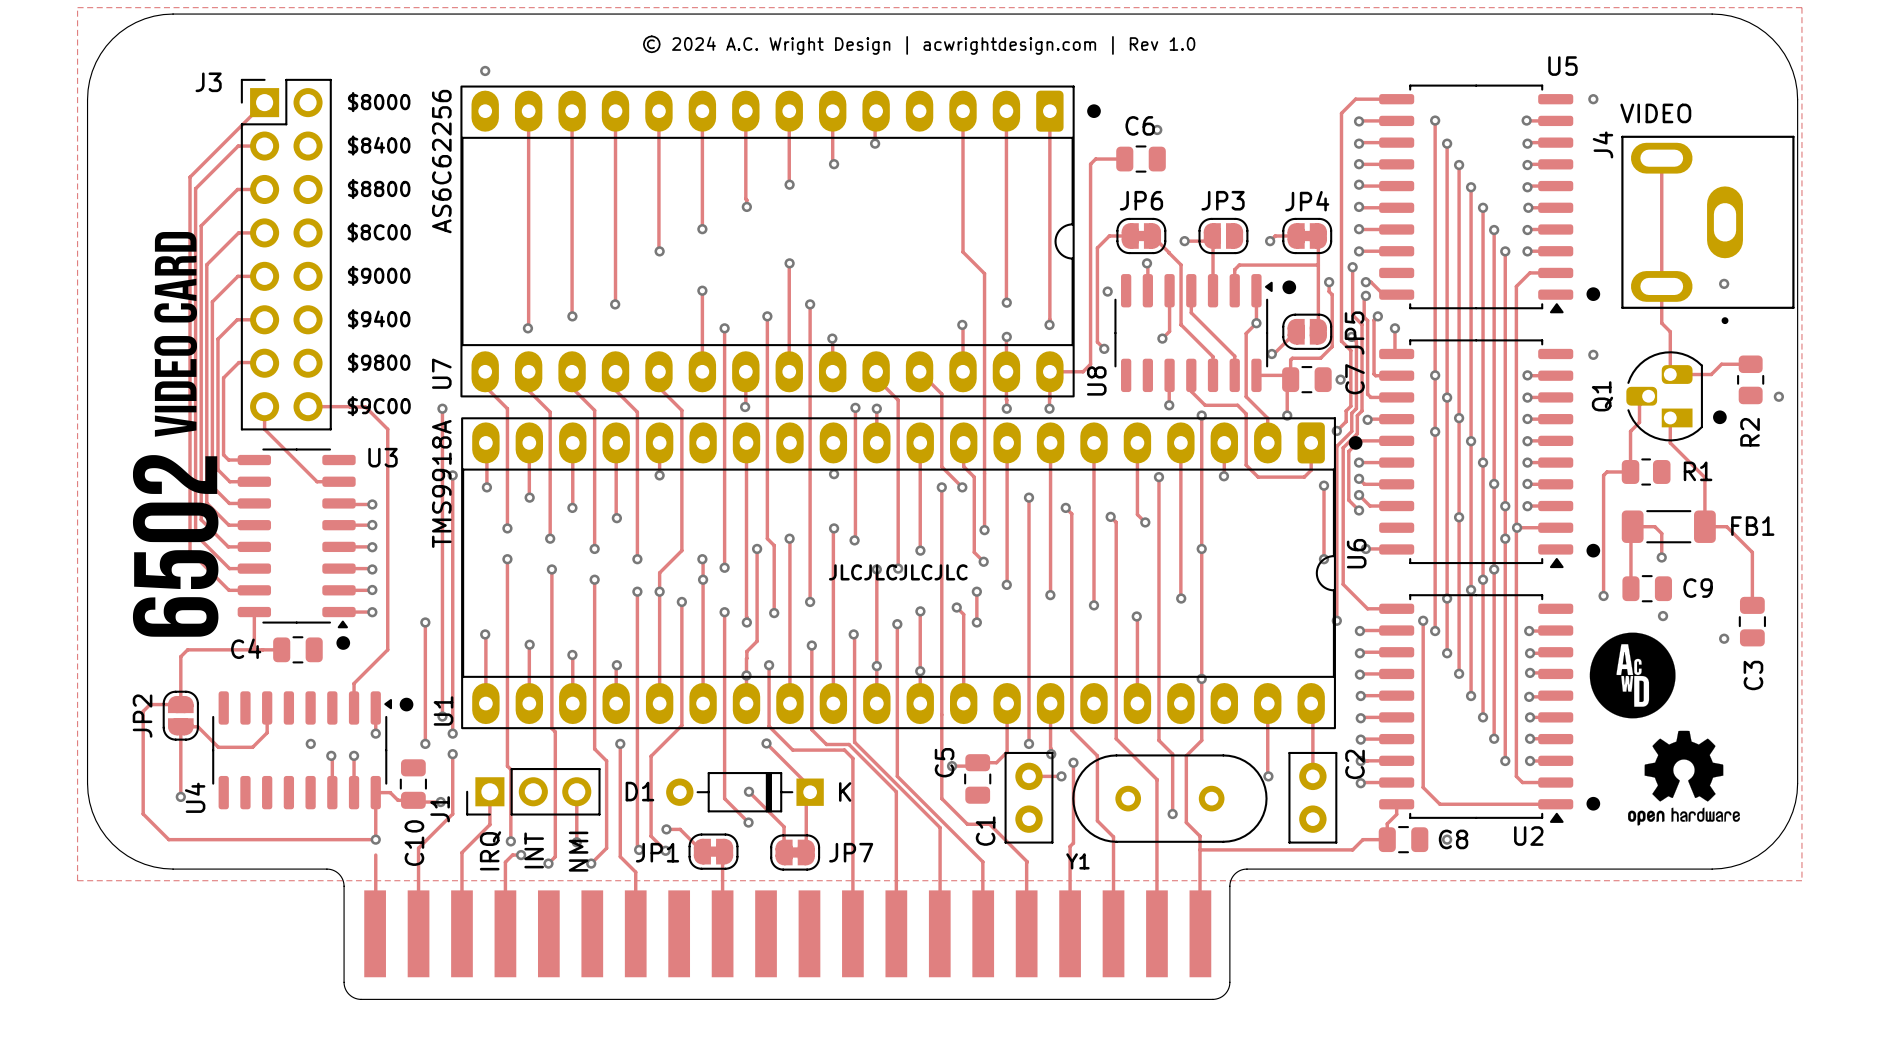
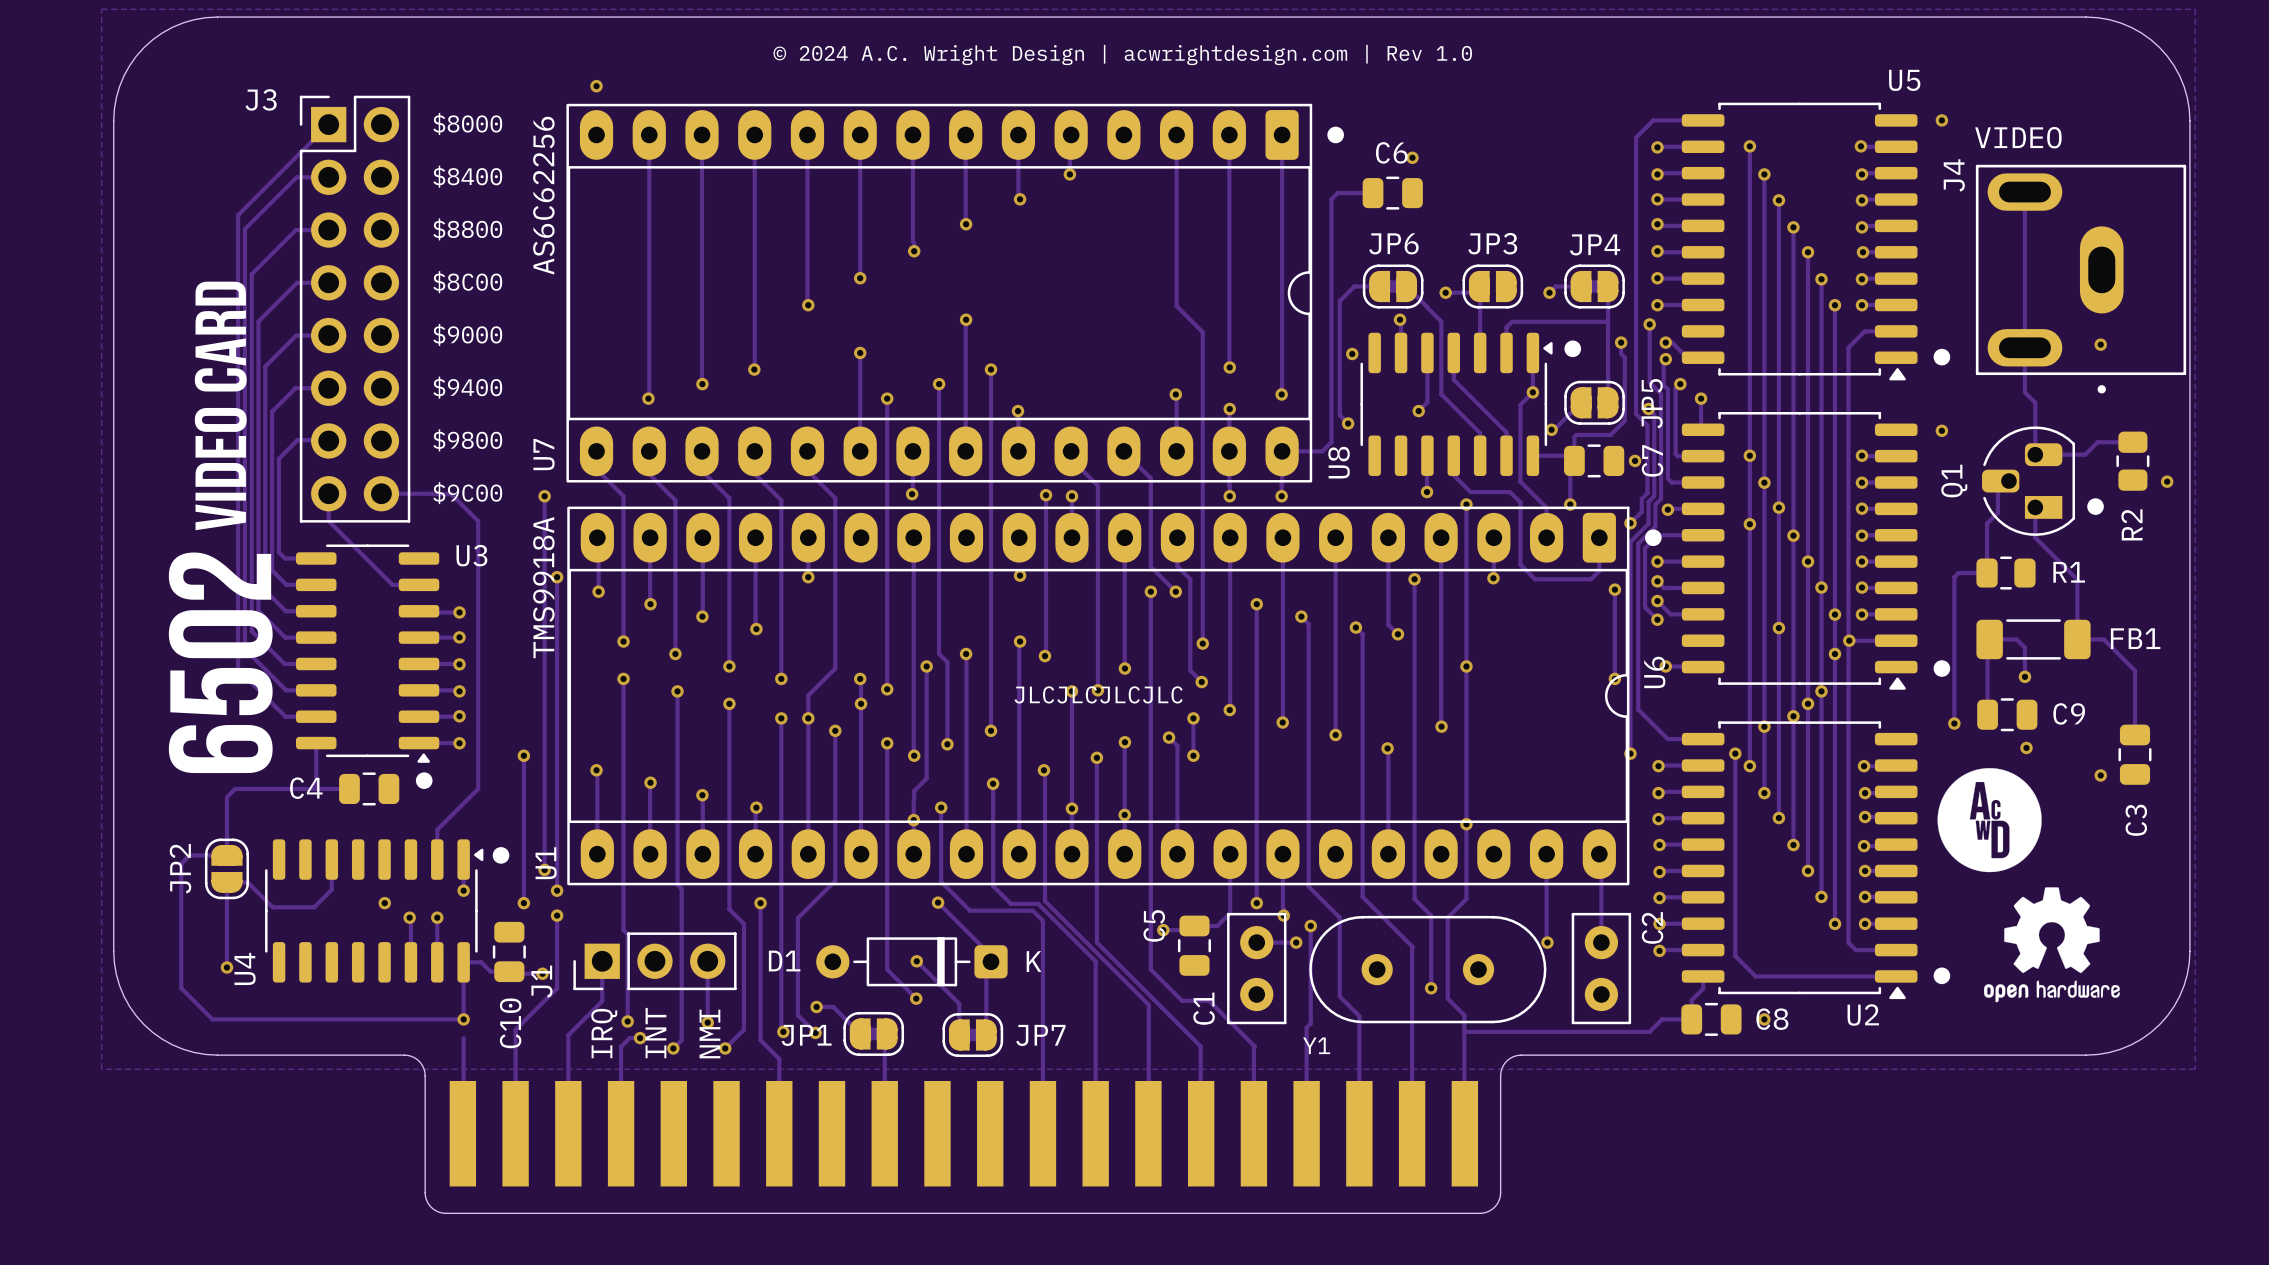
D1 footprint: [666, 772, 824, 813] -> [816, 937, 1008, 987]

